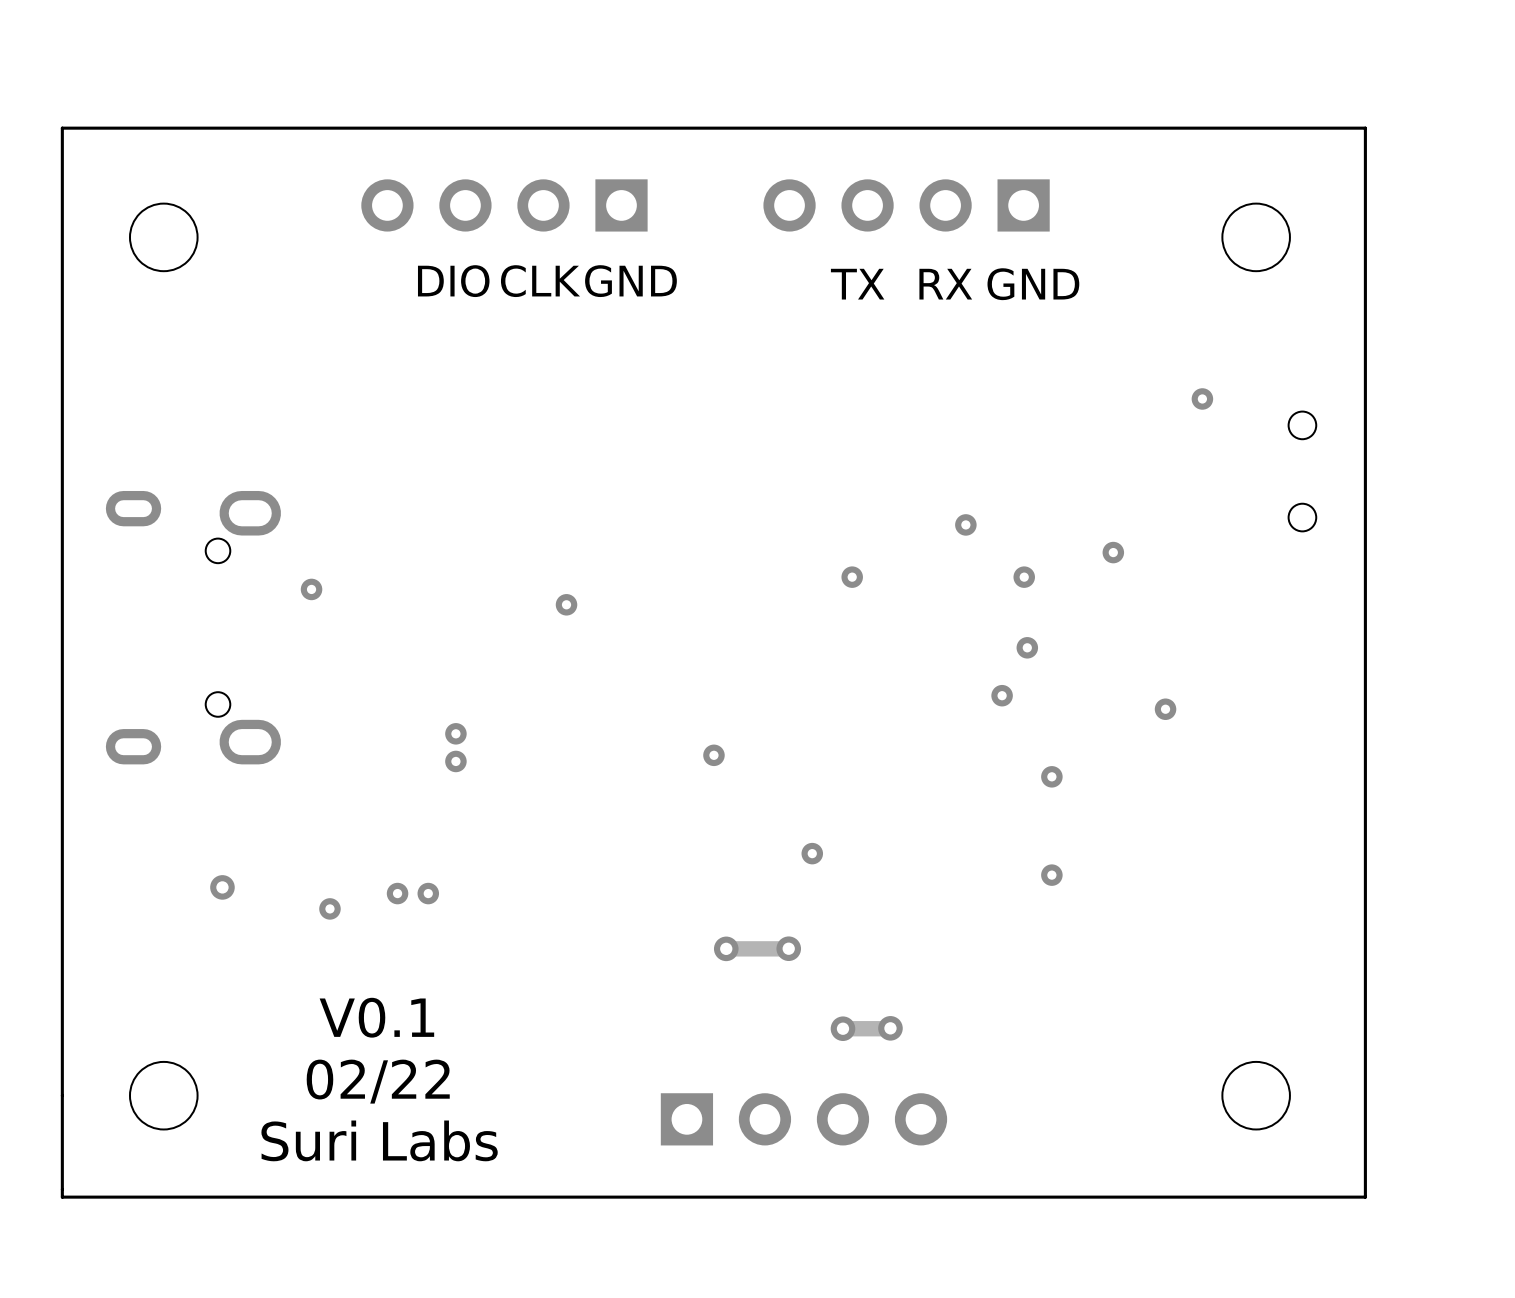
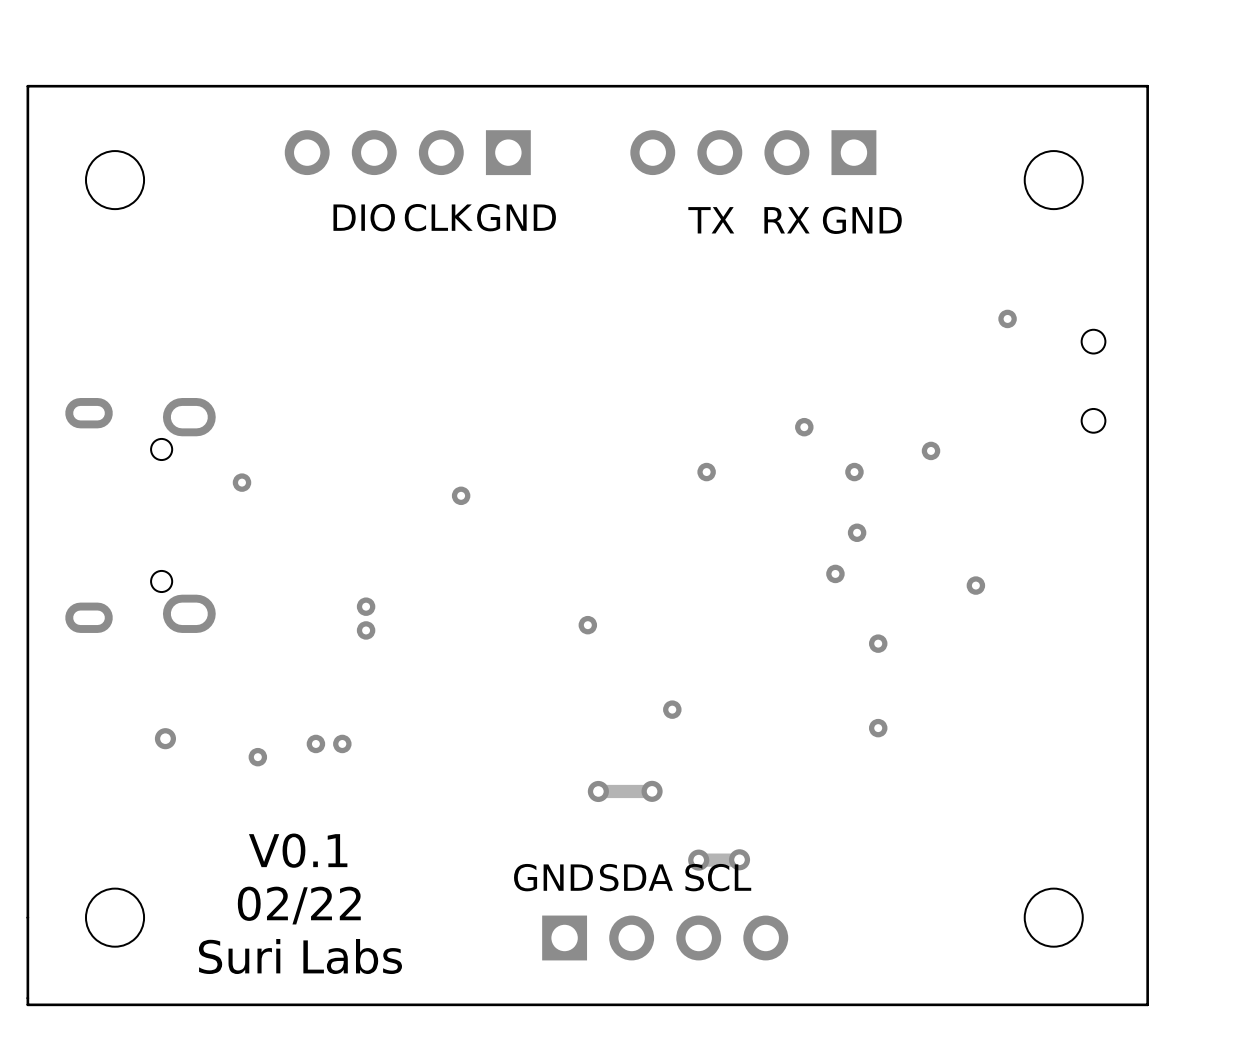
text: none -> GND (553, 877)
text: none -> SDA (636, 877)
text: none -> SCL (718, 877)

